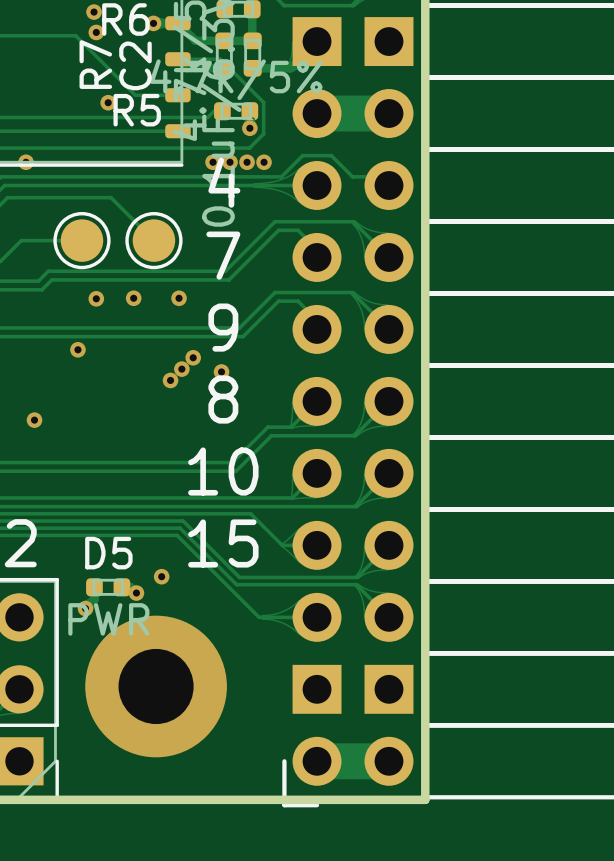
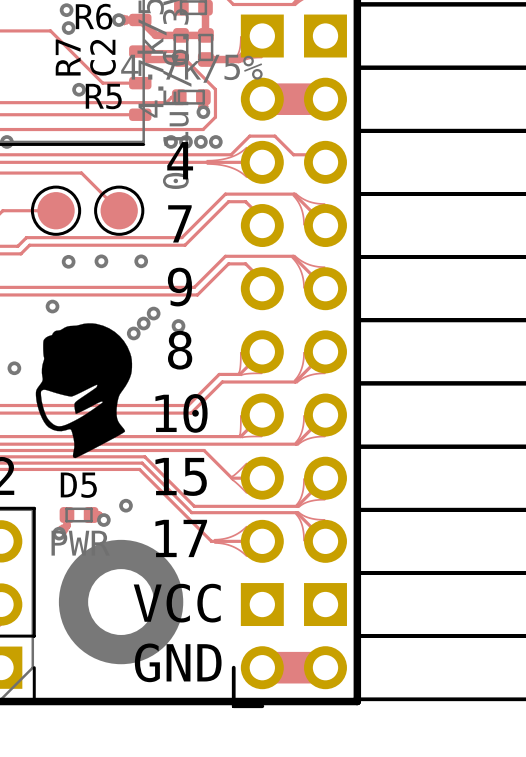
drawing: none -> [35, 323, 133, 459]
text: none -> 17 (181, 538)
text: none -> VCC (177, 603)
text: none -> GND (178, 662)

